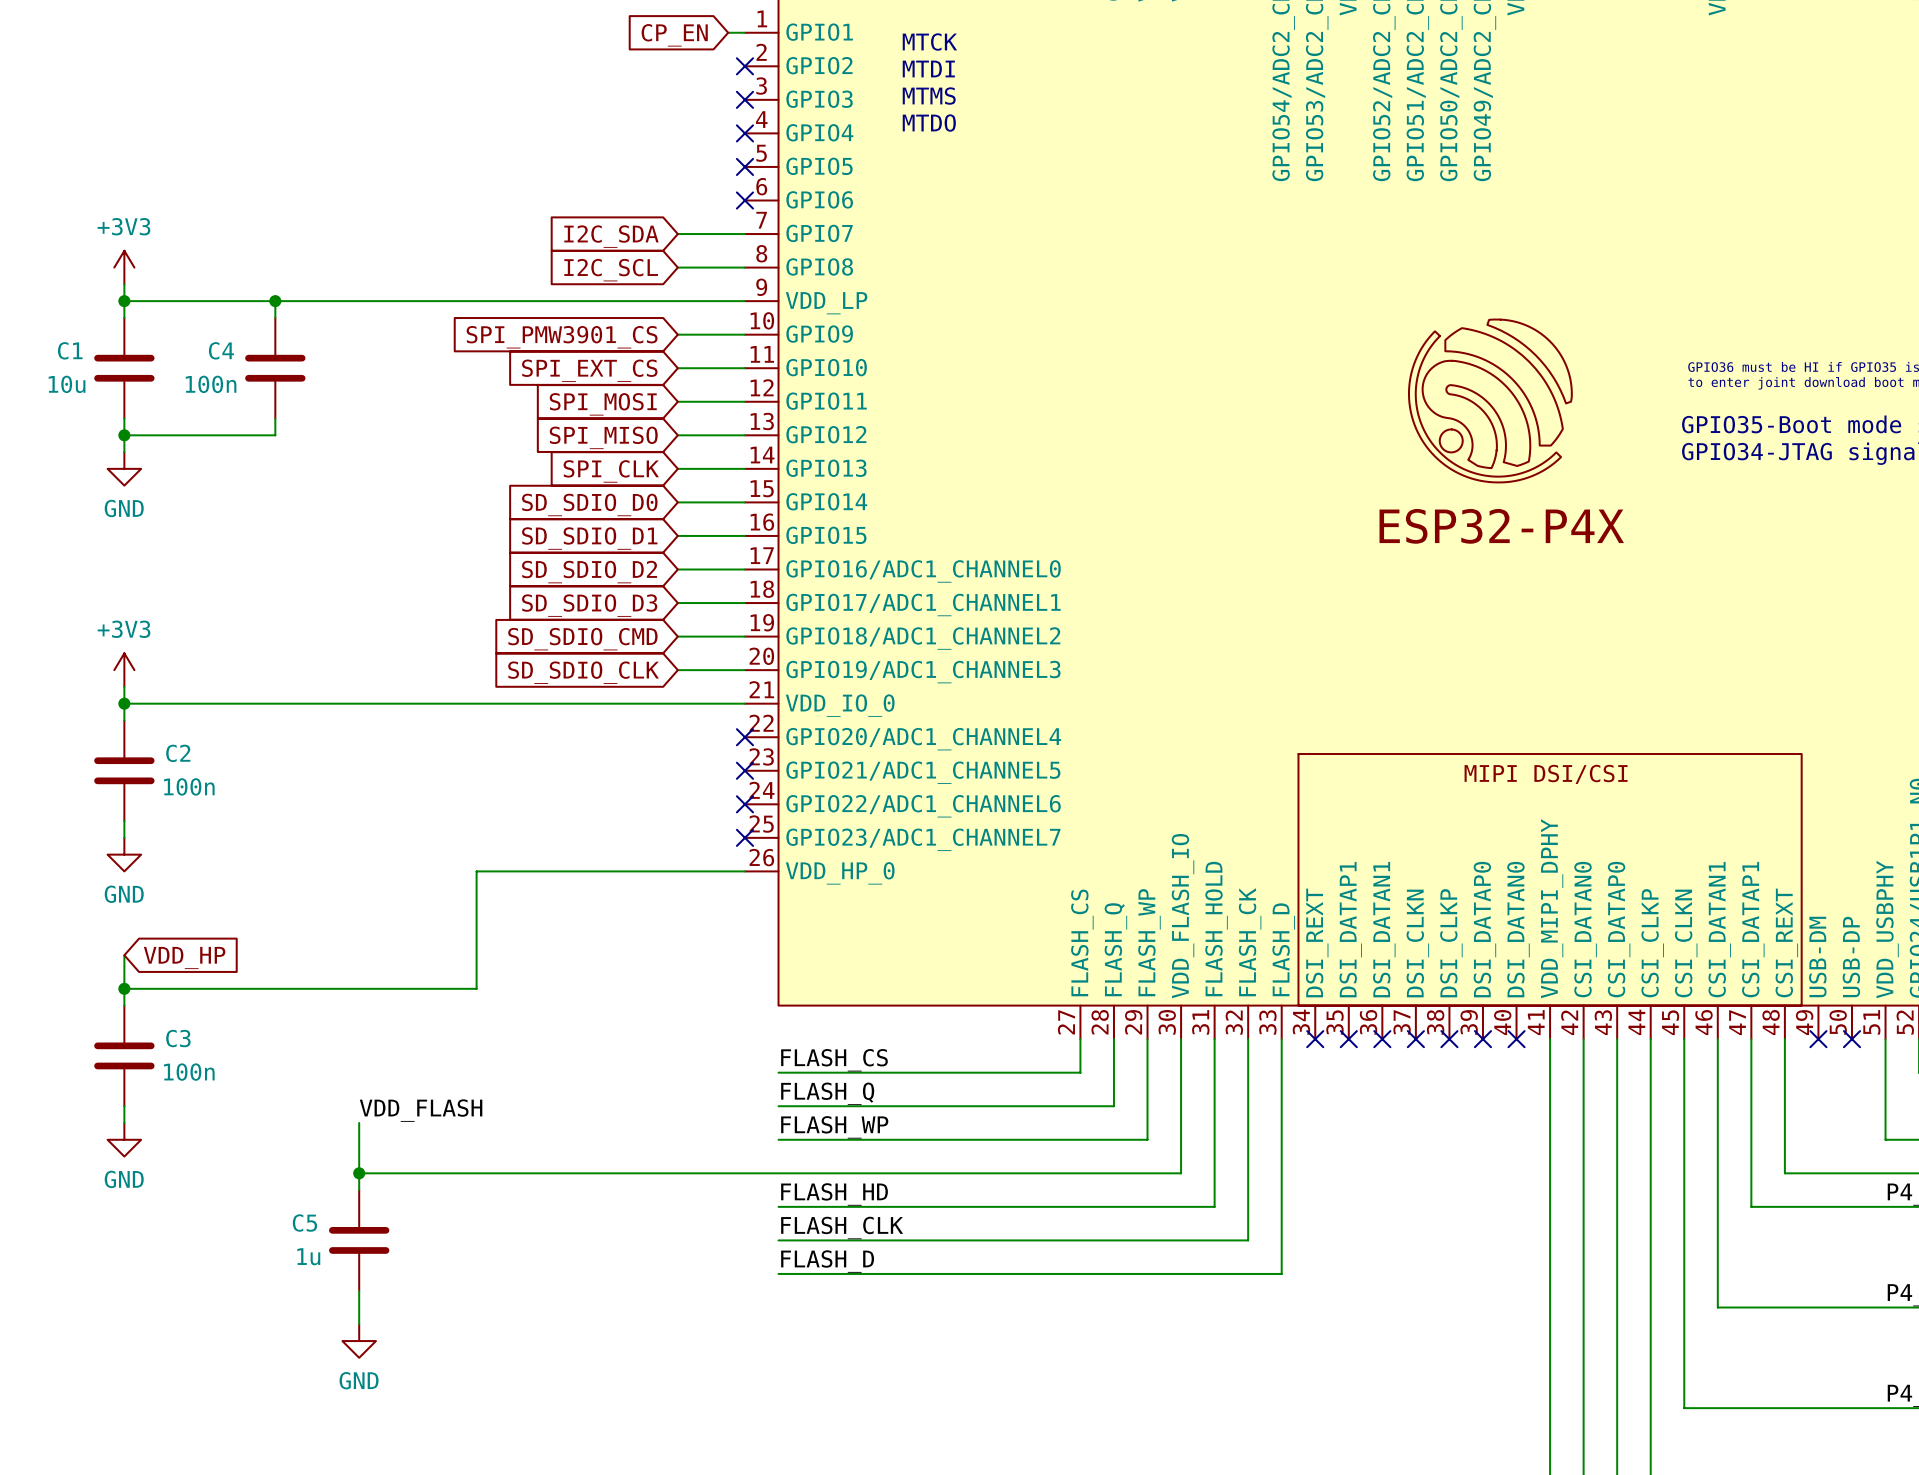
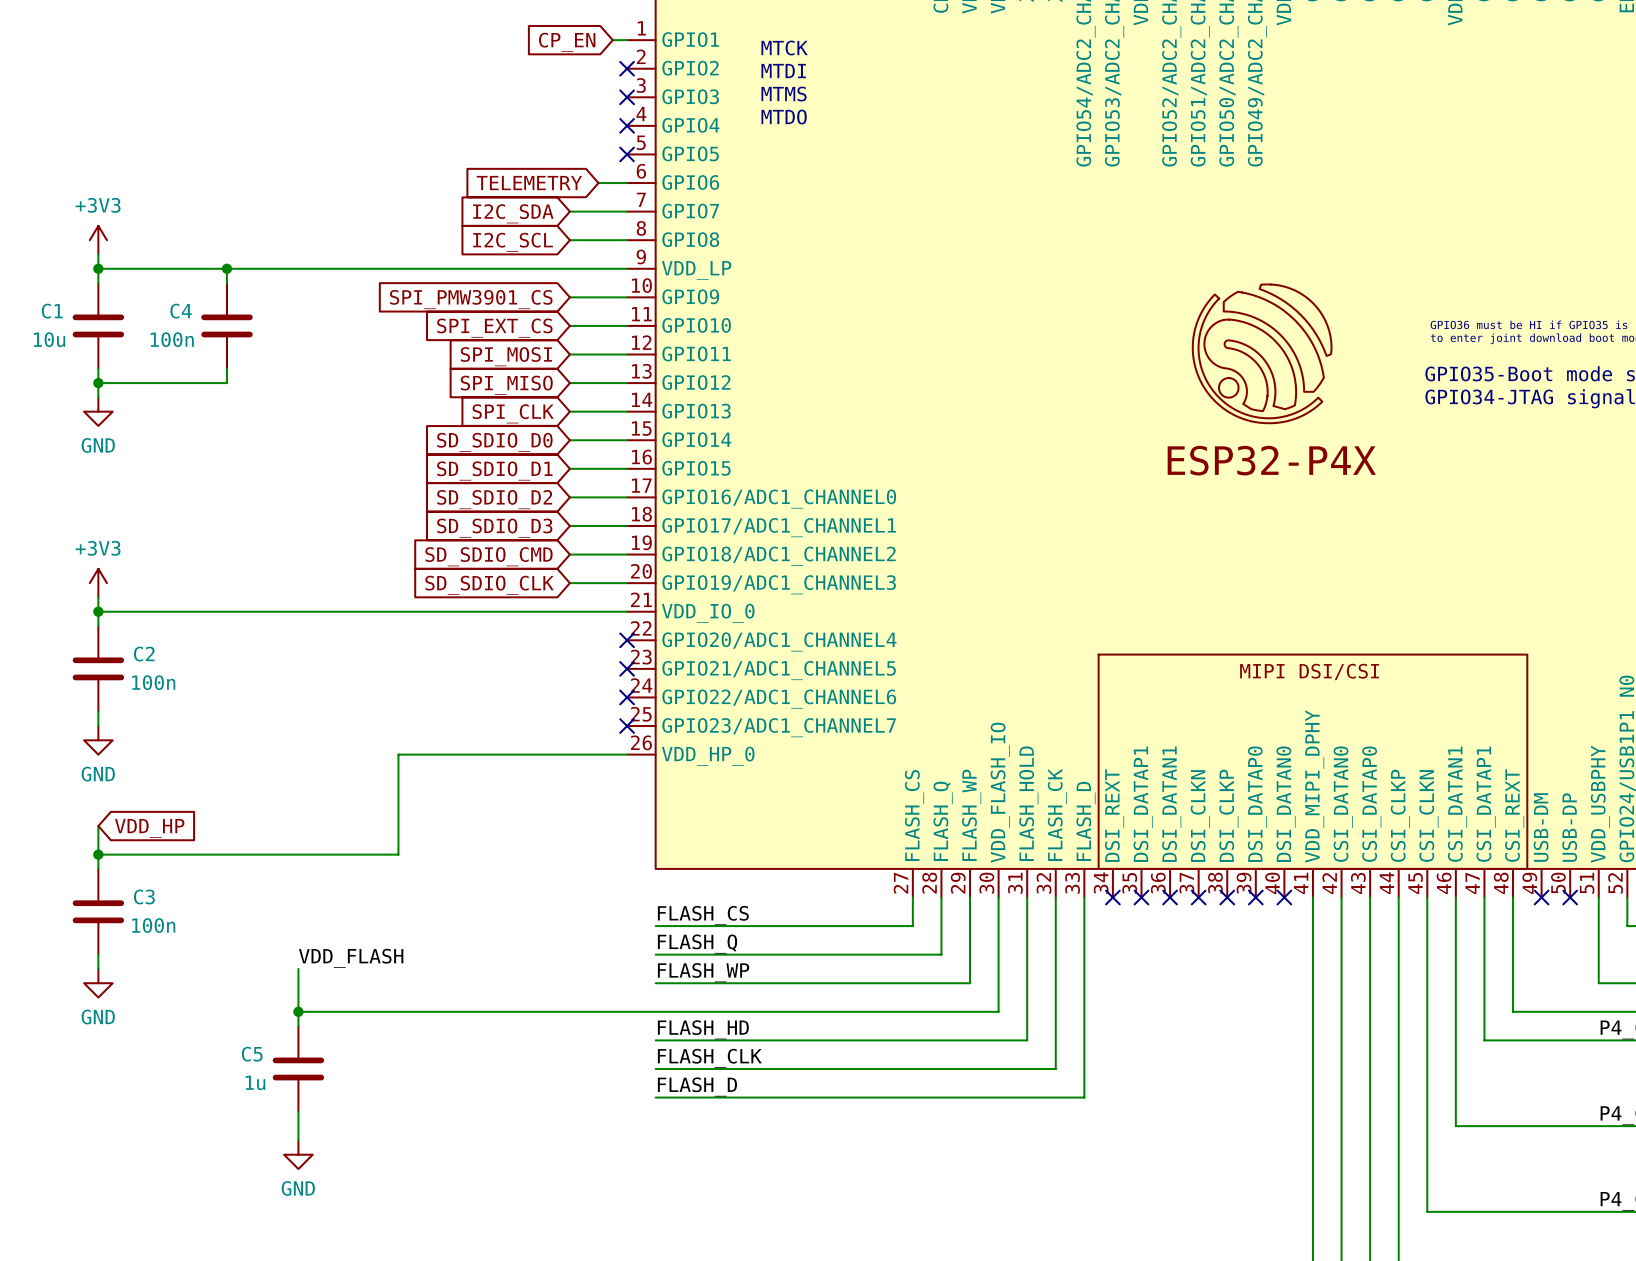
global label: none -> TELEMETRY (529, 183)
wire: none -> (598, 183) (627, 183)
no-connect mark: (744, 200) -> none

